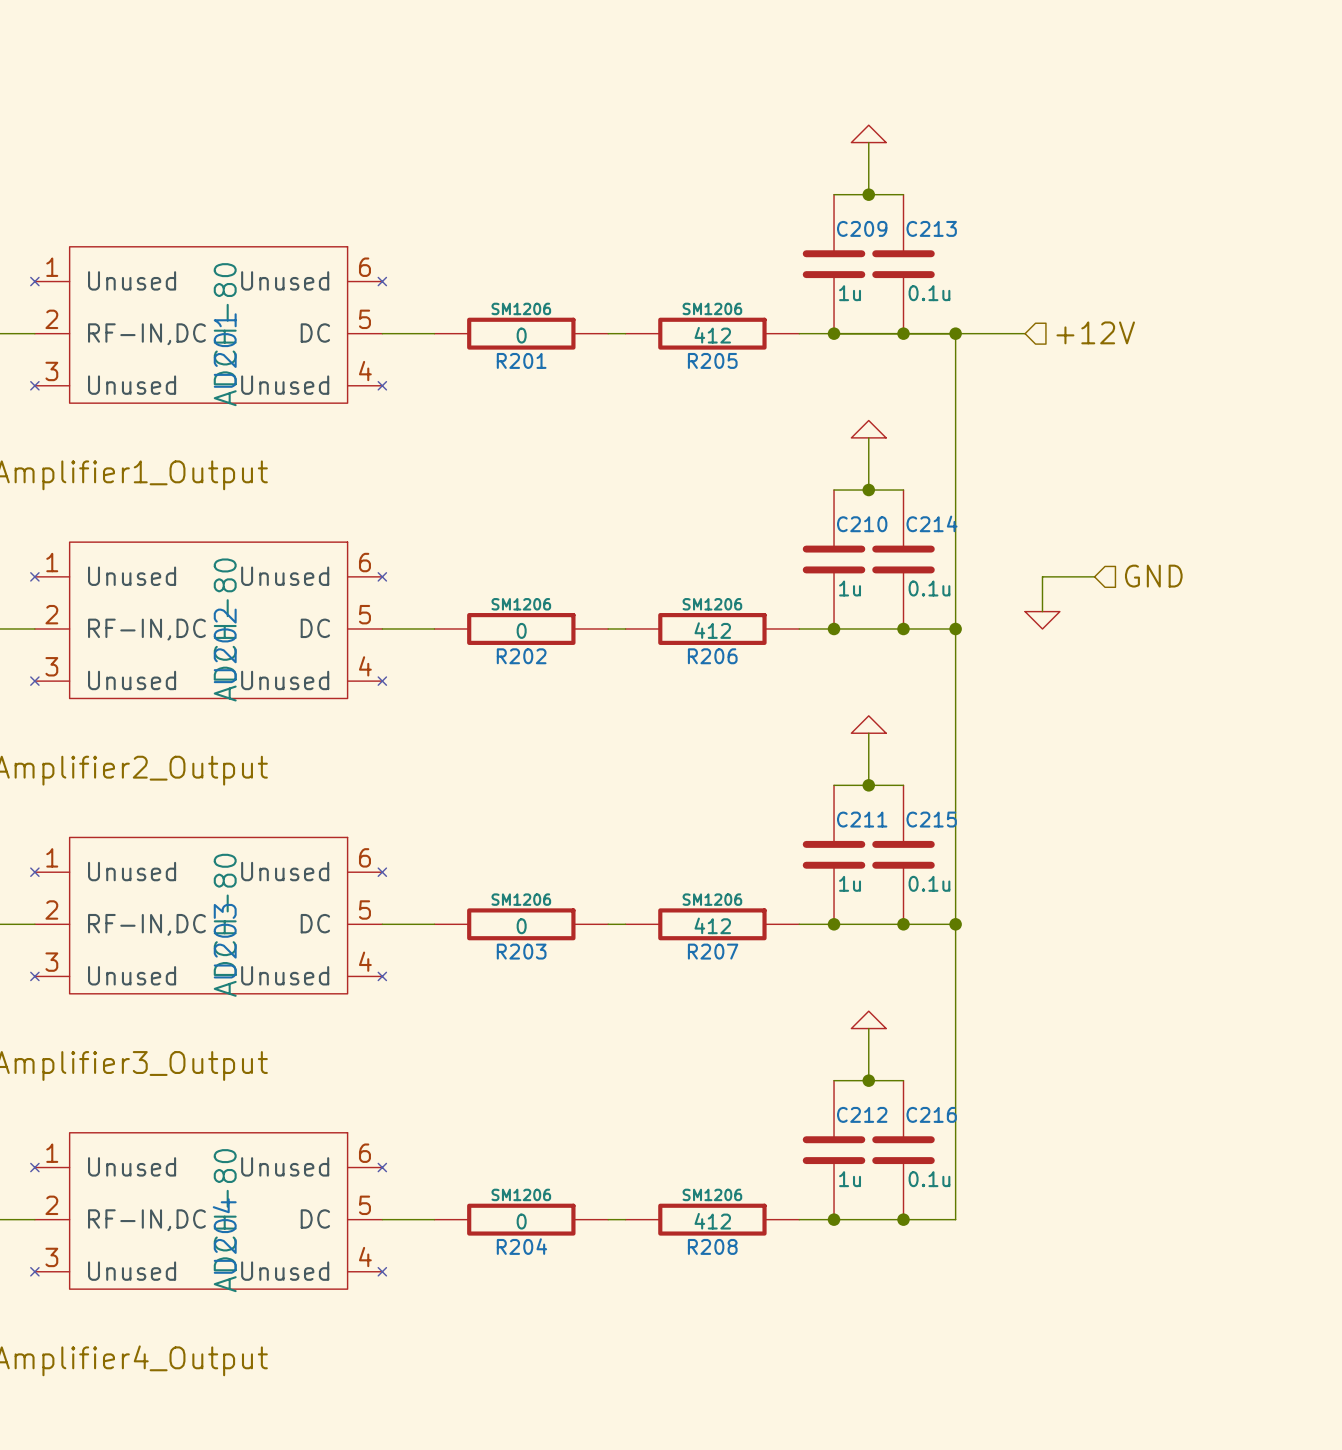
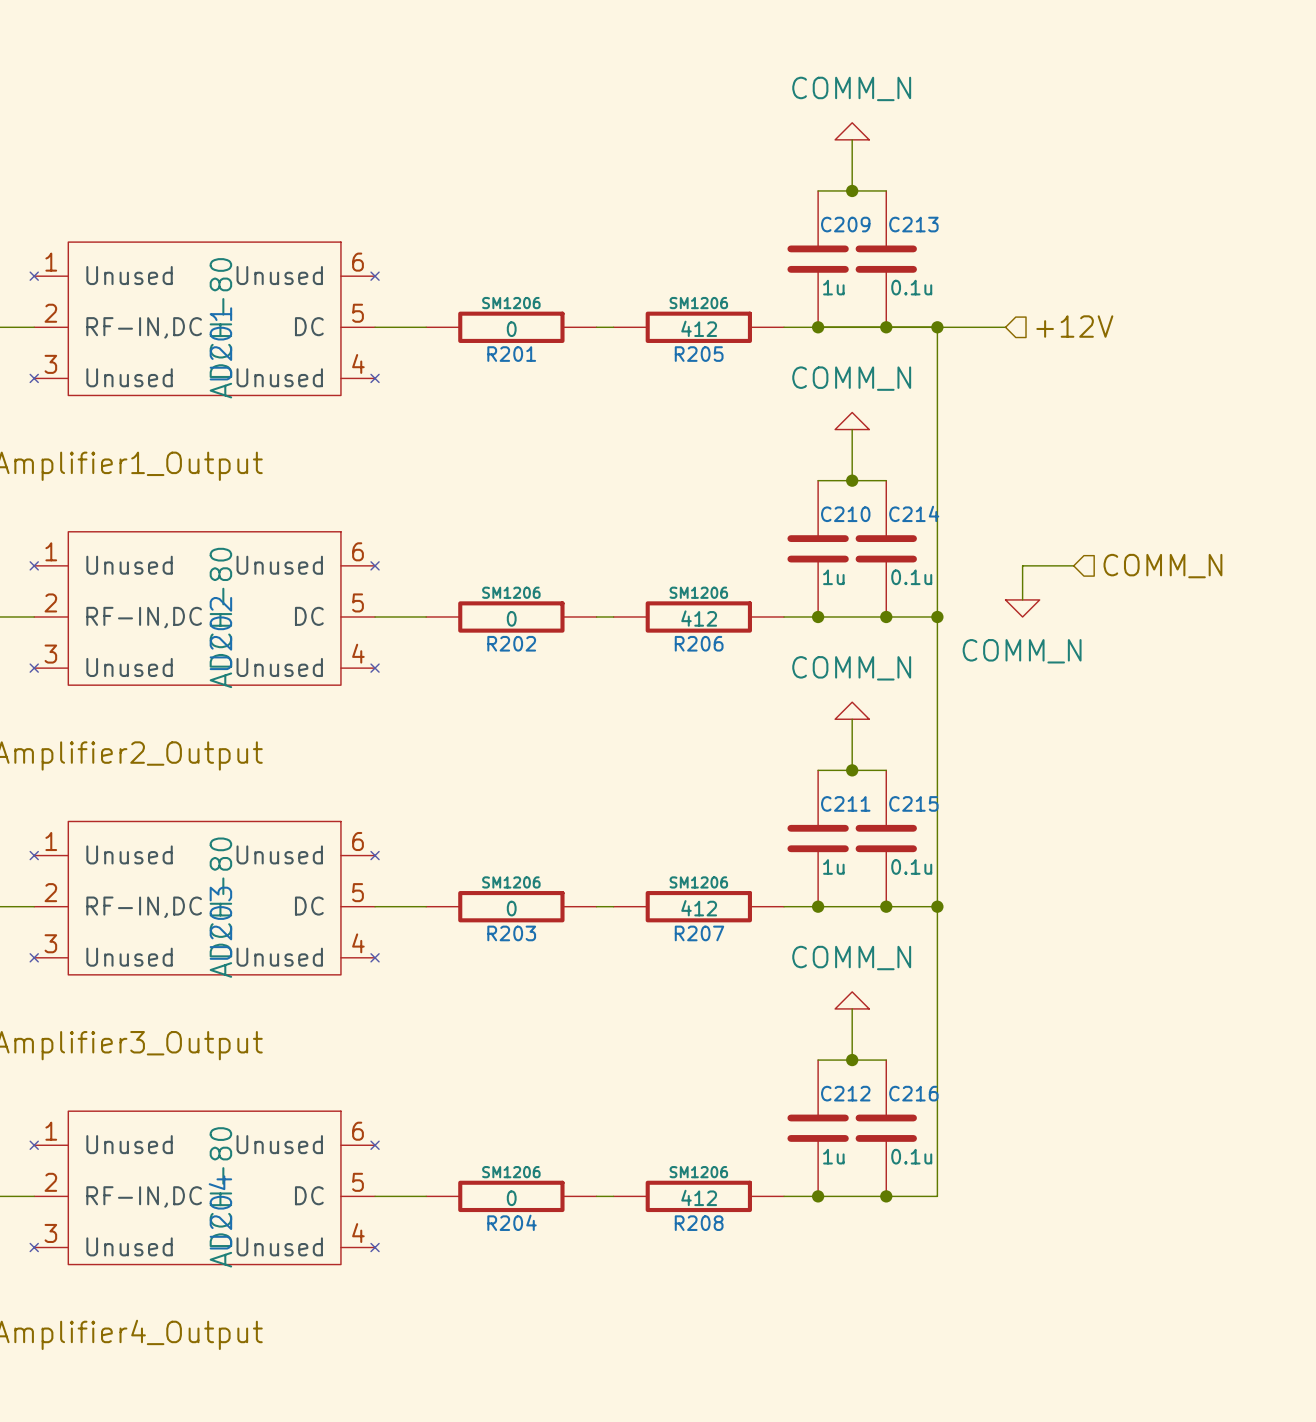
power symbol text: none -> COMM_N (851, 88)
power symbol text: none -> COMM_N (851, 378)
hierarchical label: GND (1153, 576) -> COMM_N (1162, 566)
power symbol text: none -> COMM_N (1022, 651)
power symbol text: none -> COMM_N (851, 668)
power symbol text: none -> COMM_N (851, 958)

